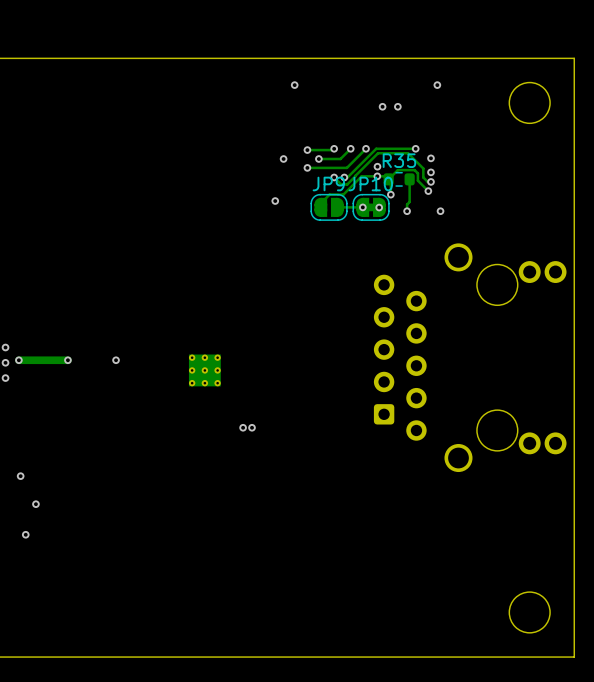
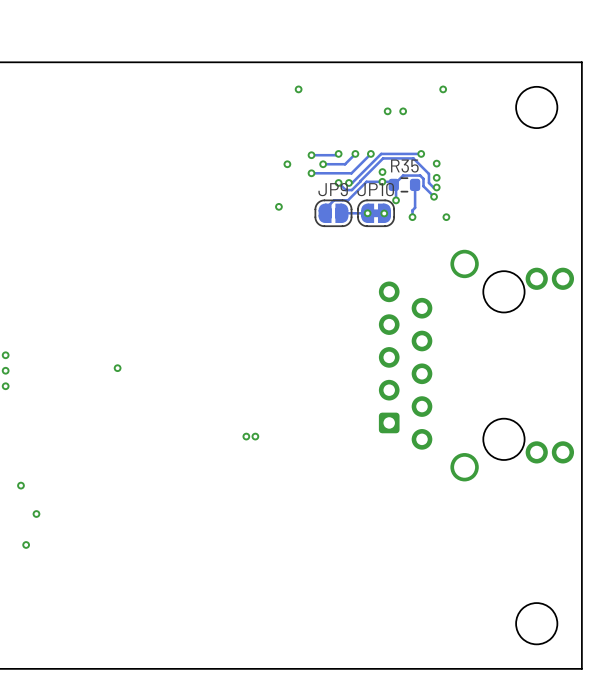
via: (18, 360) -> none
track: (67, 360) (18, 360) -> none
via: (67, 360) -> none
part: (204, 370) -> none

